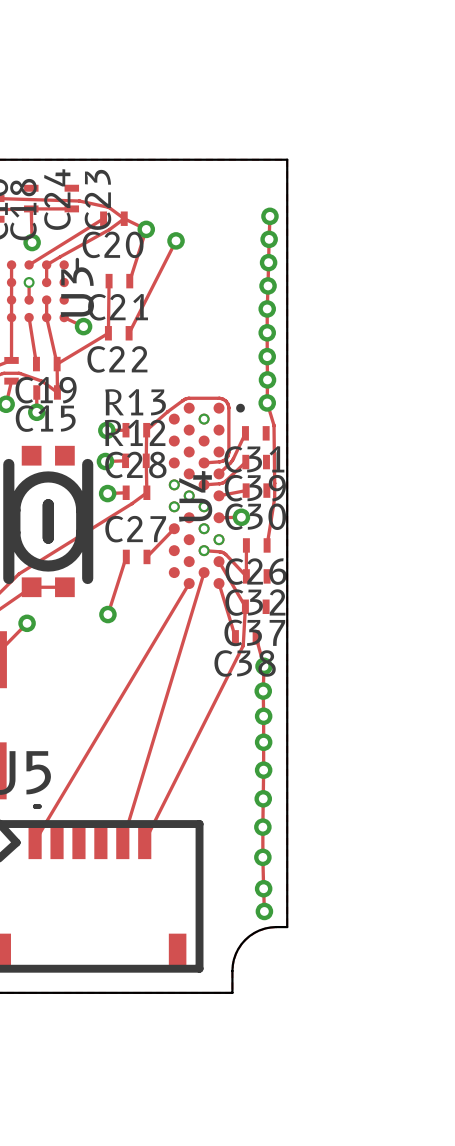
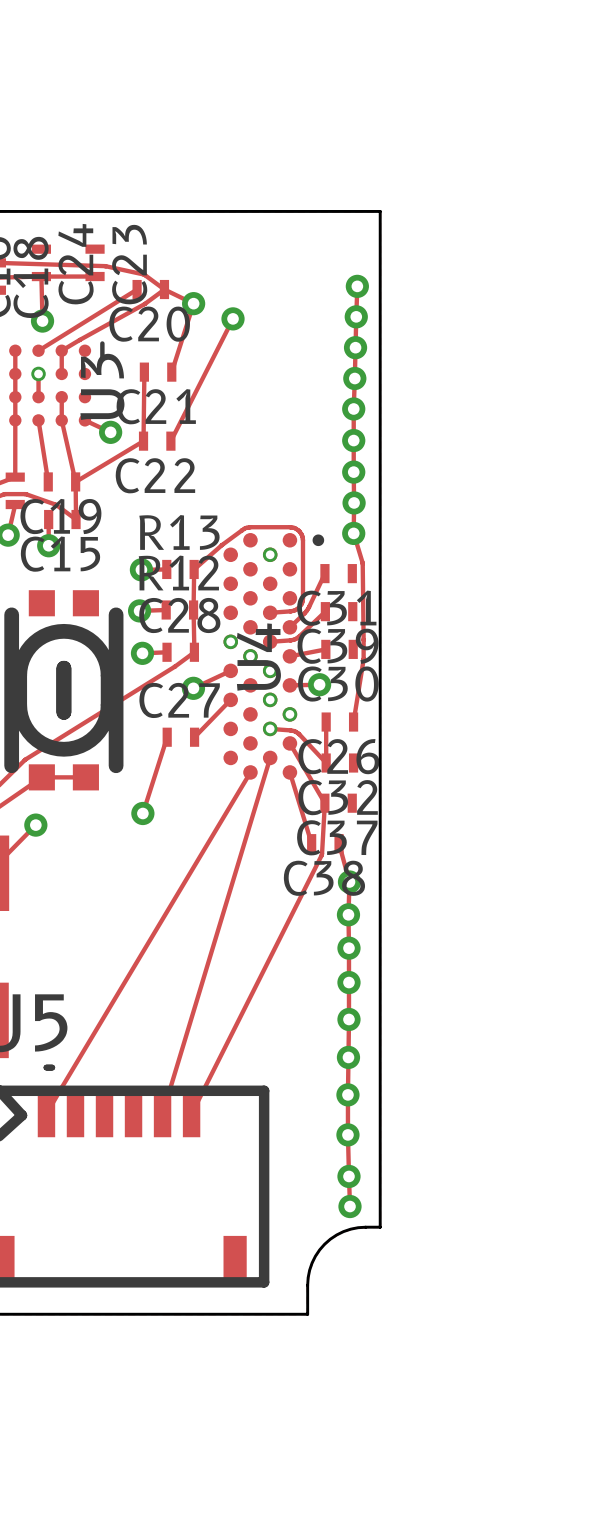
track: none -> (230, 670) (193, 688)
via: (174, 506) -> none
via: none -> (193, 688)

